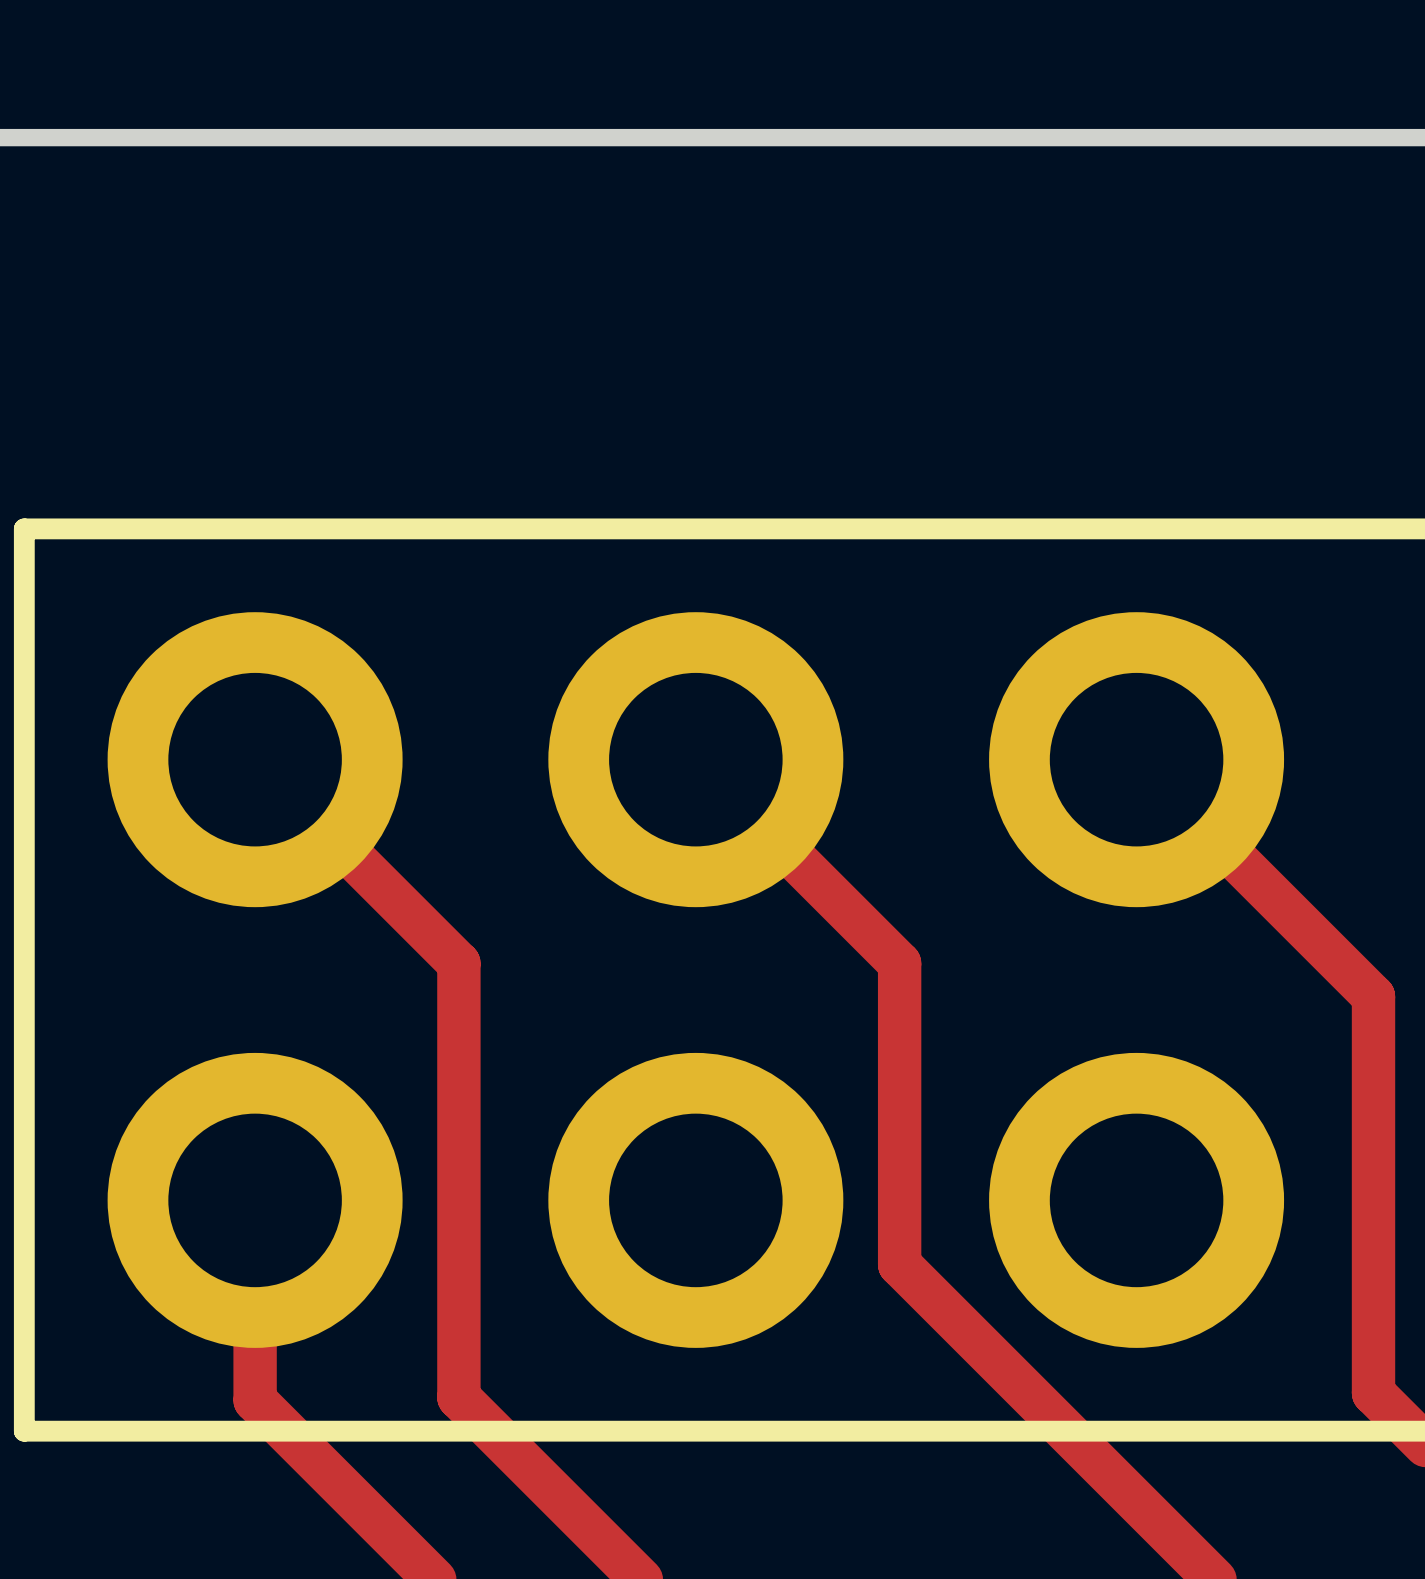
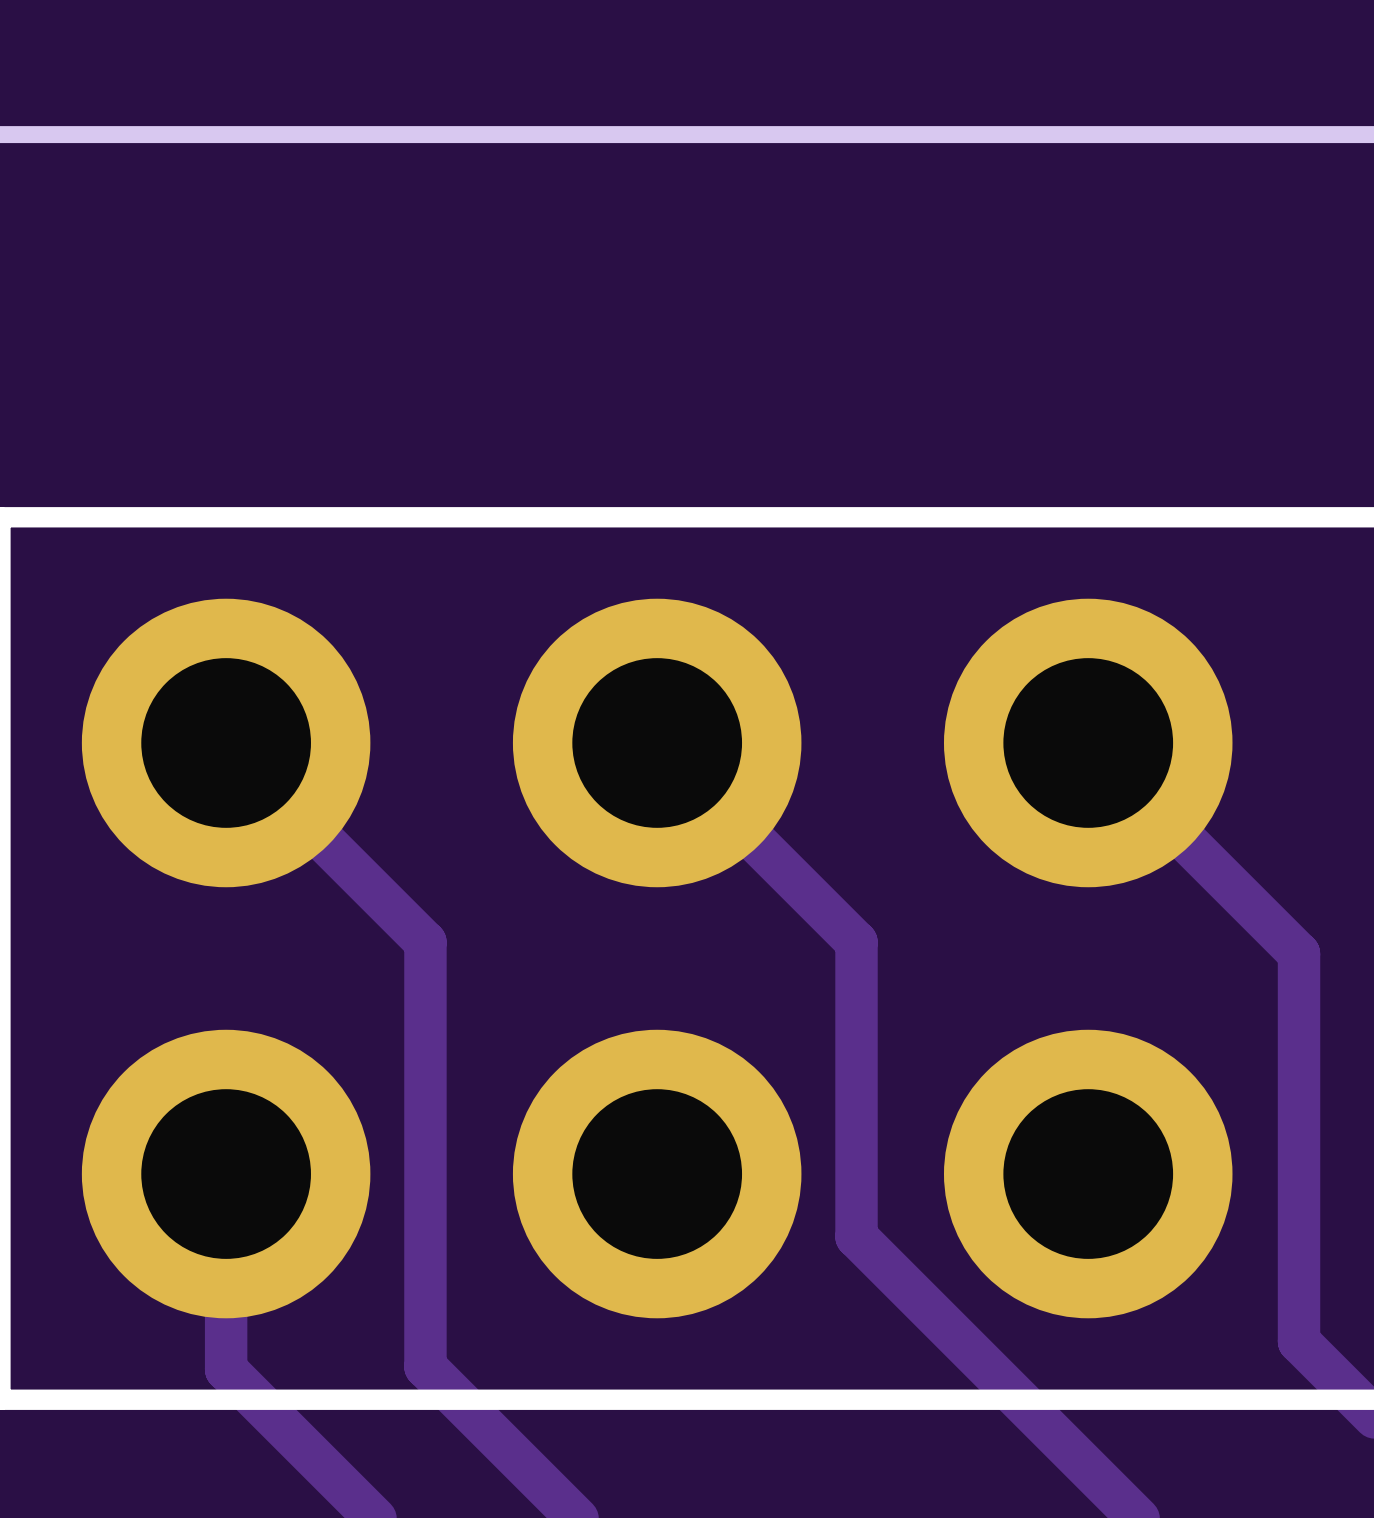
track: (1352, 975) (1373, 996) (1373, 1393) -> (1299, 953) (1299, 1341) (1319, 1362)

